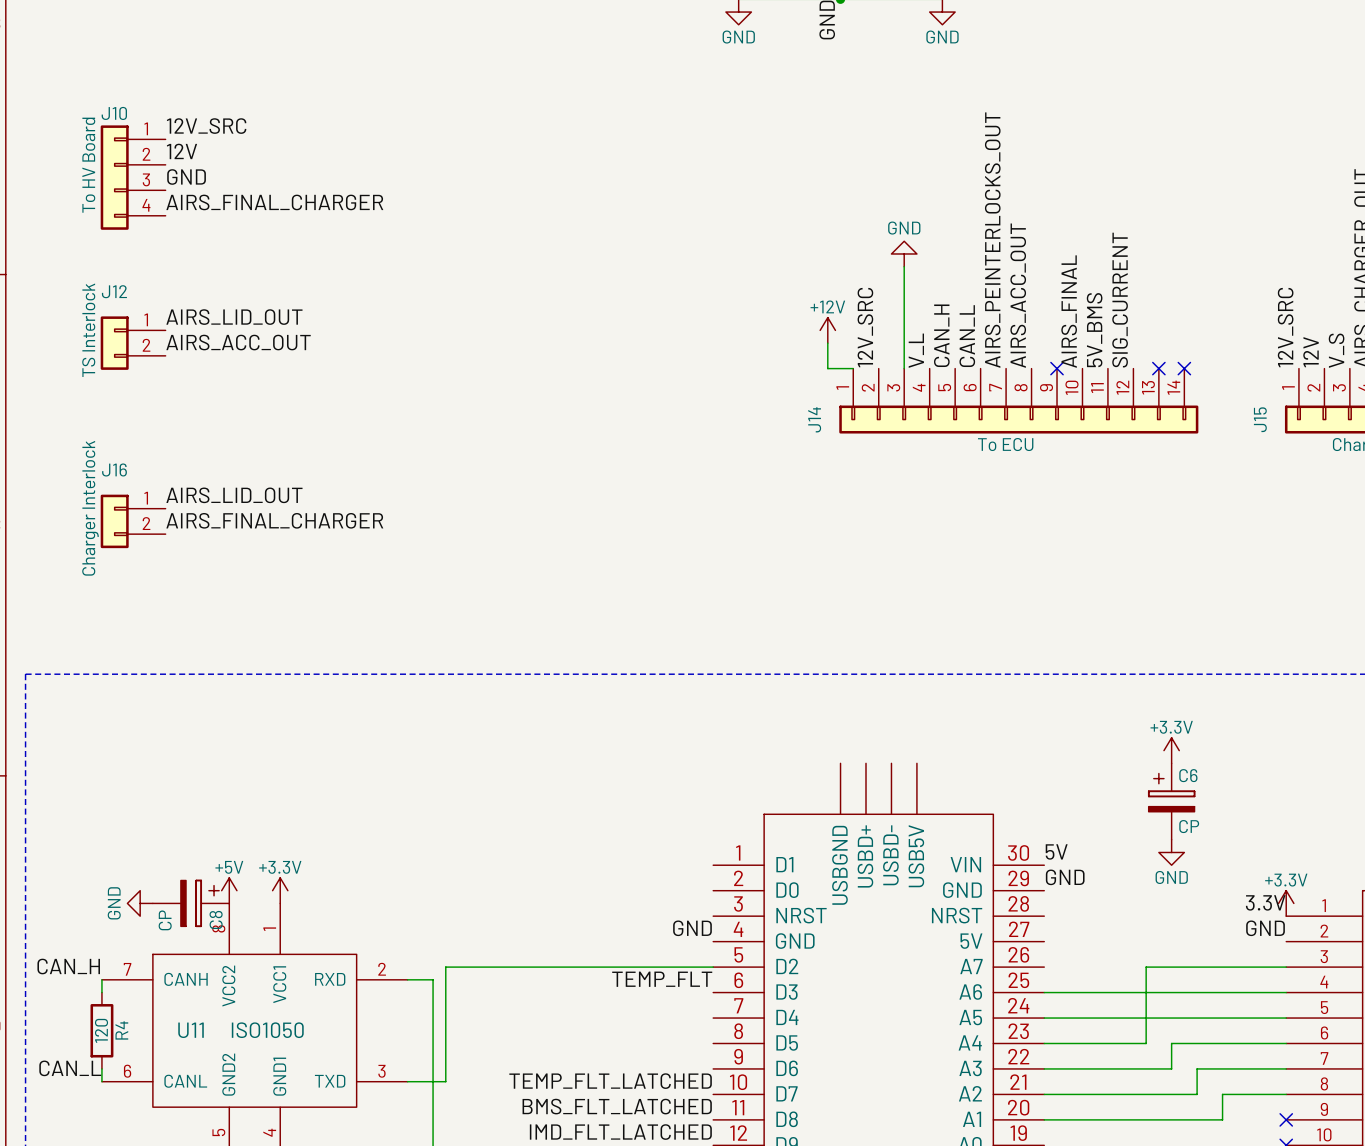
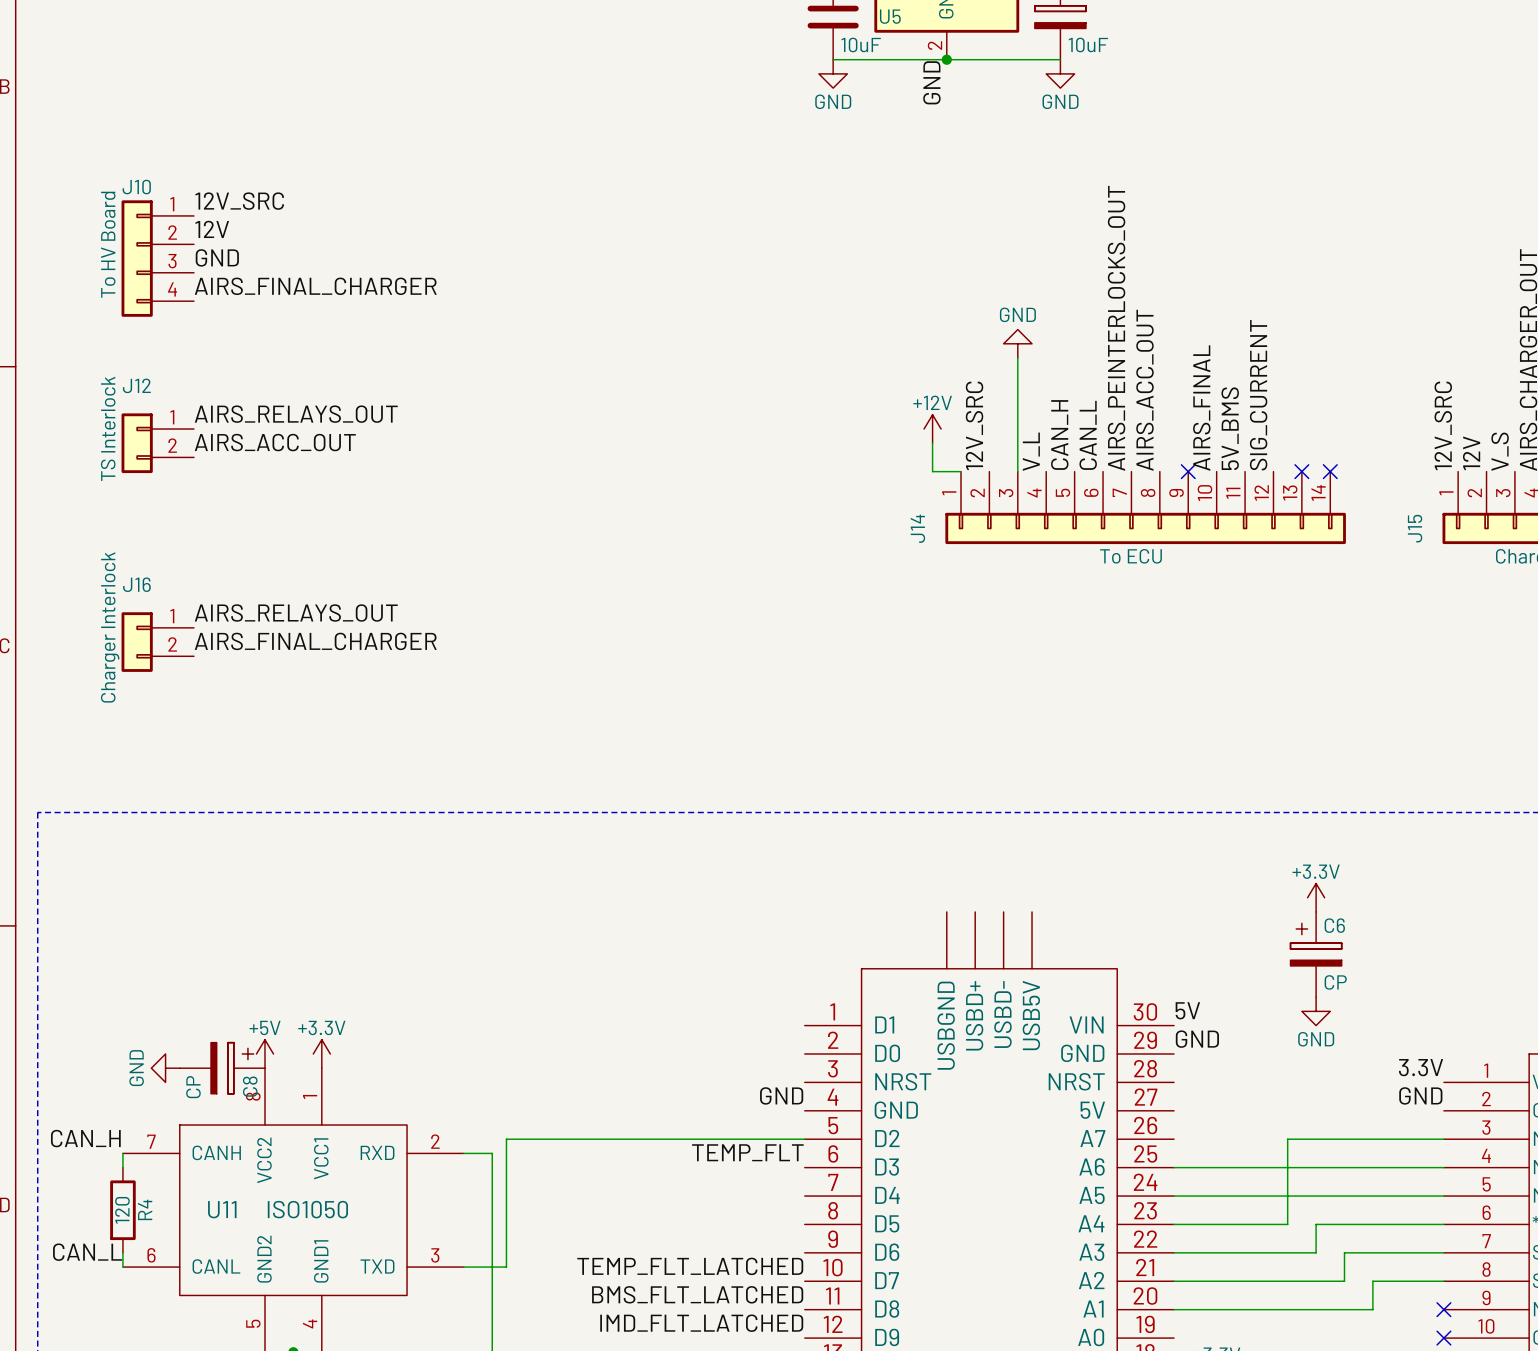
label: AIRS_LID_OUT (234, 317) -> AIRS_RELAYS_OUT (296, 414)
label: AIRS_LID_OUT (234, 495) -> AIRS_RELAYS_OUT (296, 613)
power symbol: +3.3V (1286, 903) -> none

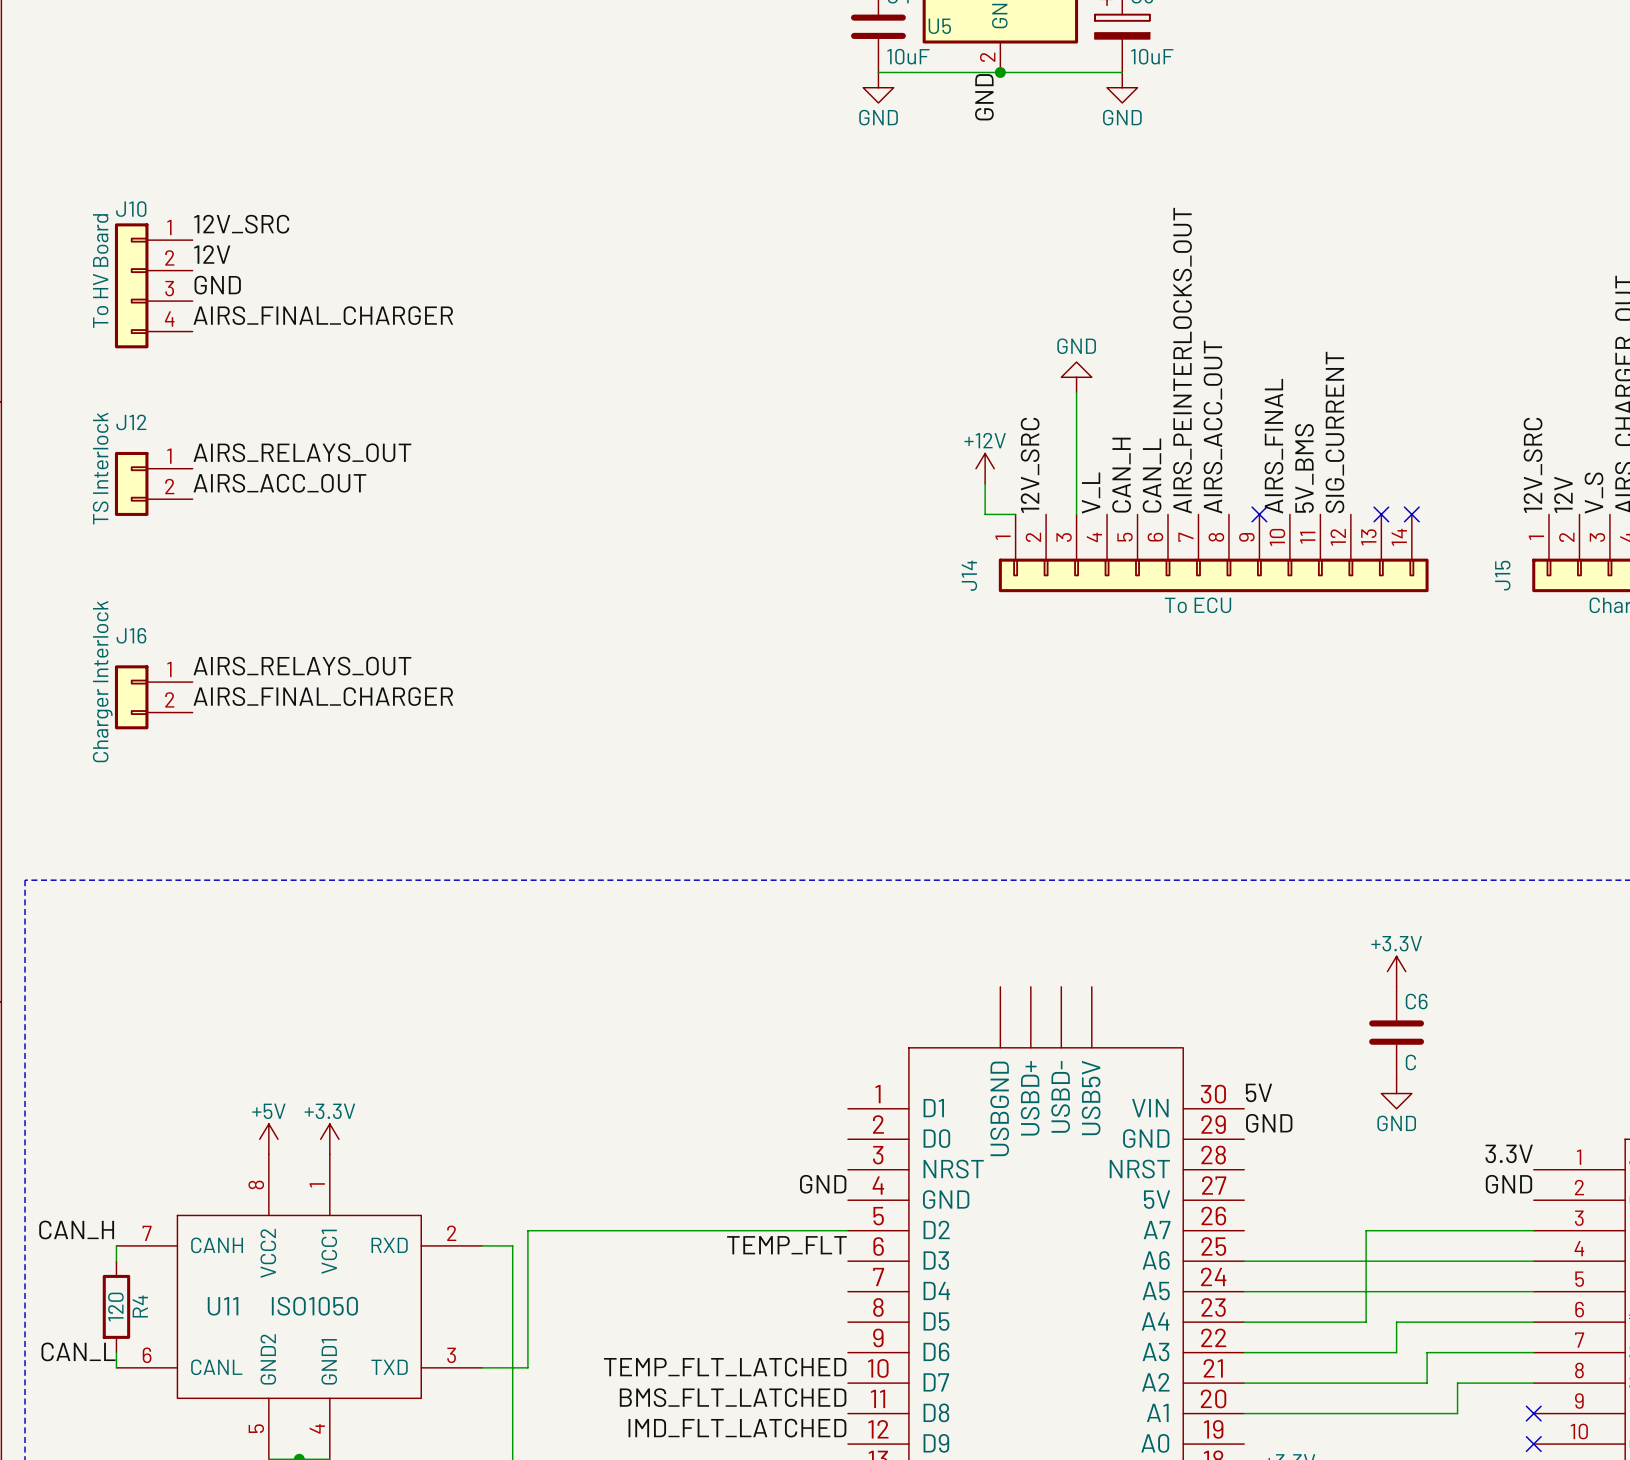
C6 symbol: [1290, 911, 1342, 998] -> [1369, 986, 1425, 1079]
C6 value: CP (1335, 982) -> C (1410, 1062)
power symbol: GND (165, 1068) -> none
C8: CP (222, 1068) -> none

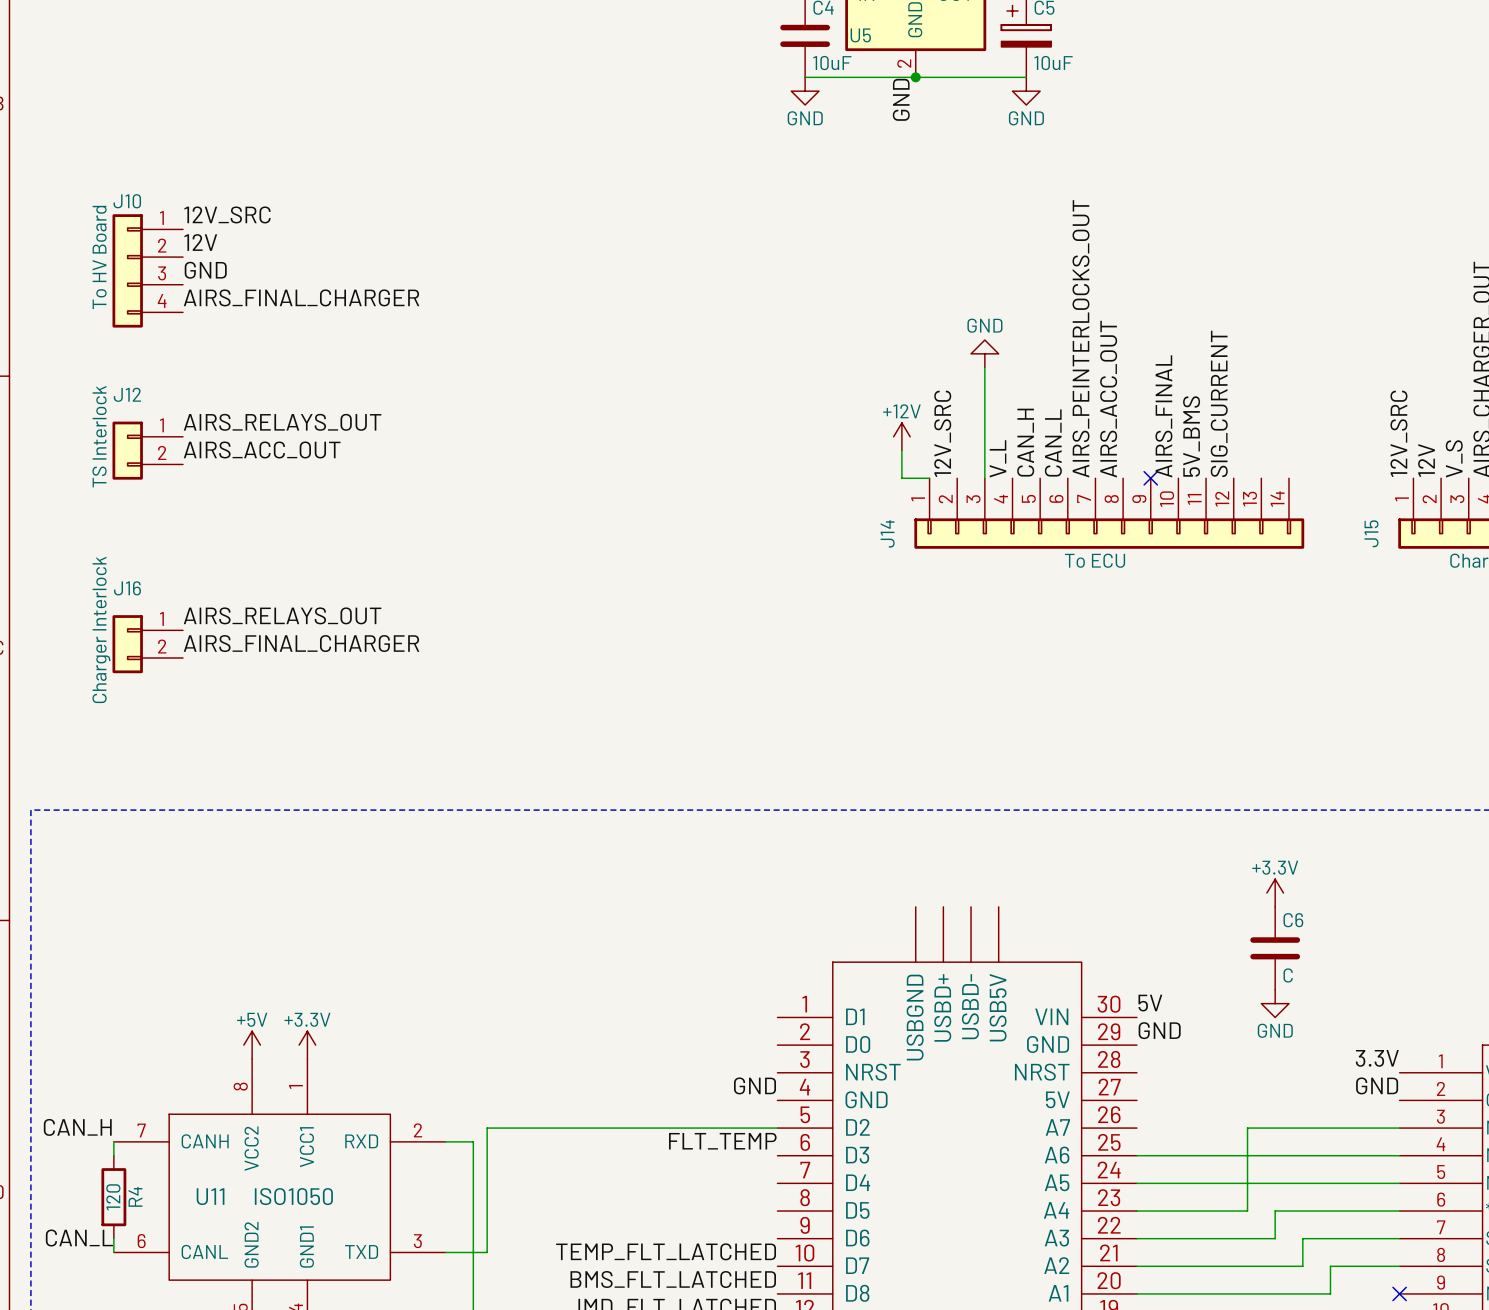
no-connect mark: (1381, 514) -> none
no-connect mark: (1411, 514) -> none
label: TEMP_FLT (786, 1245) -> FLT_TEMP (722, 1141)

